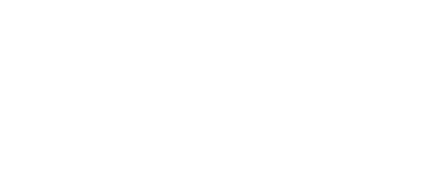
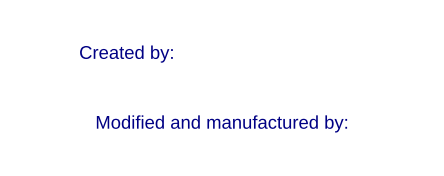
text: none -> Created by: (126, 54)
text: none -> Modified and manufactured by: (221, 123)

